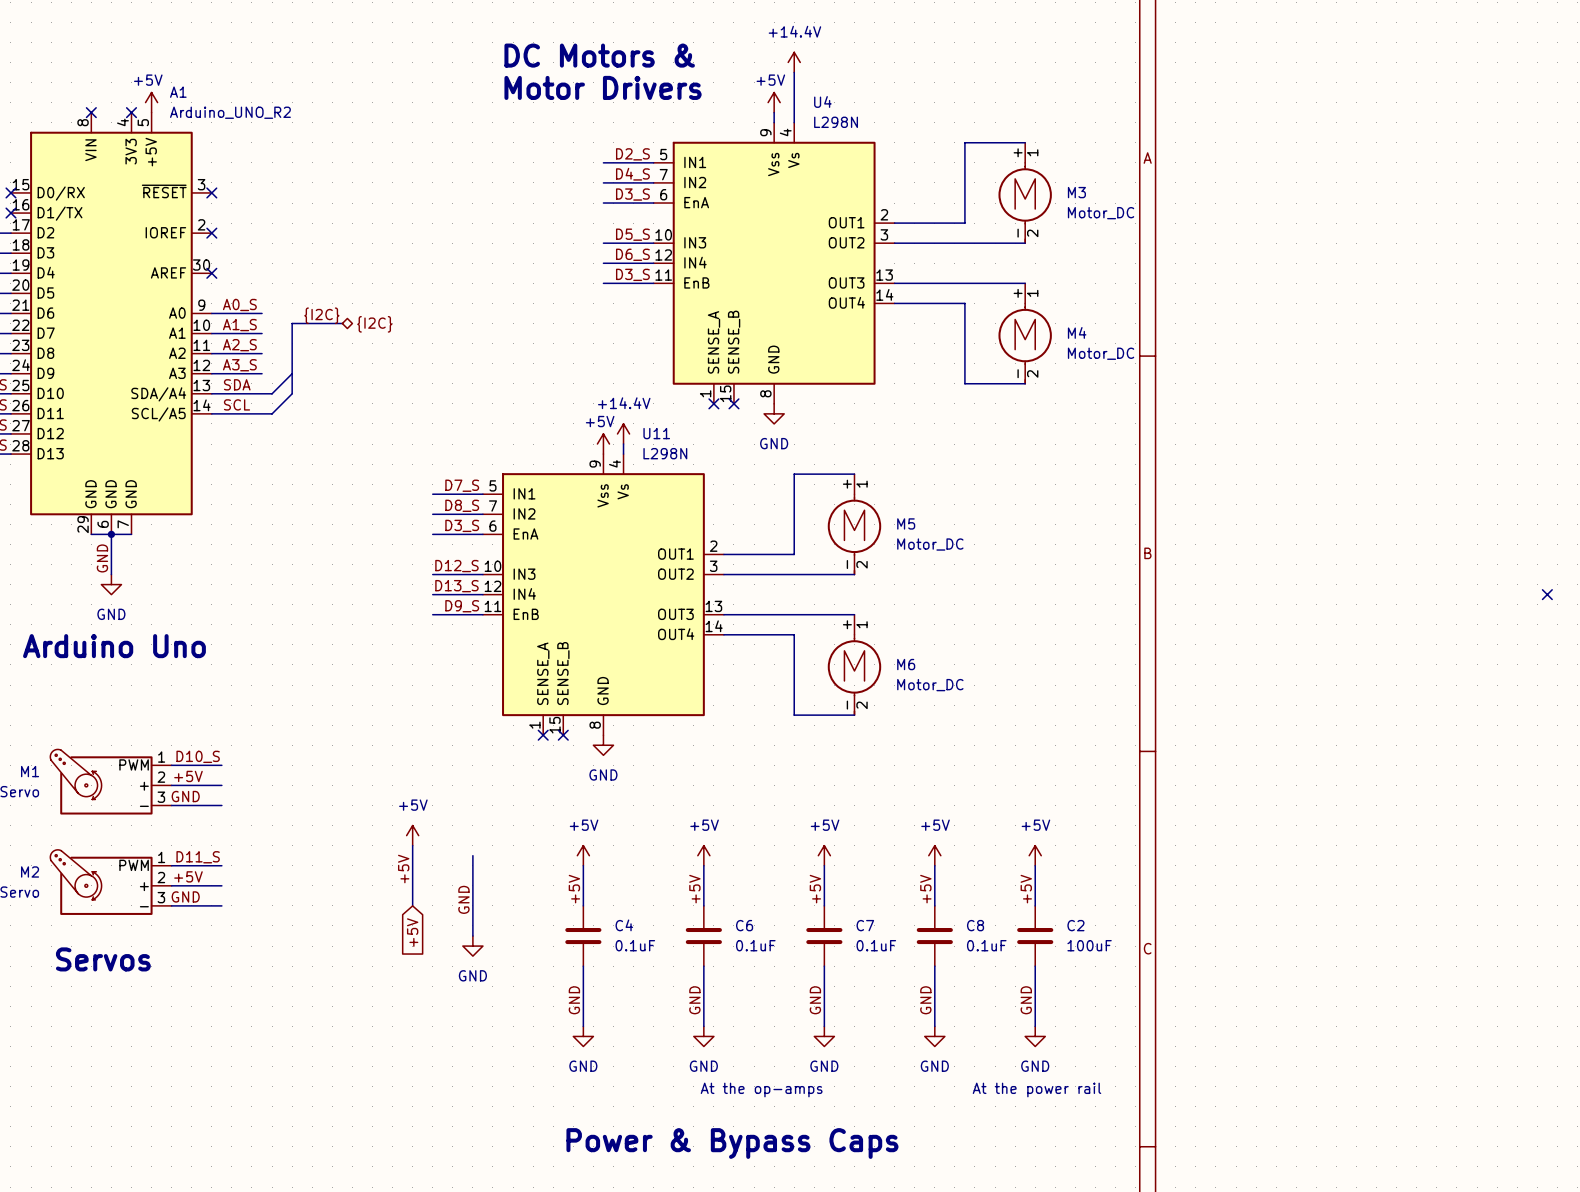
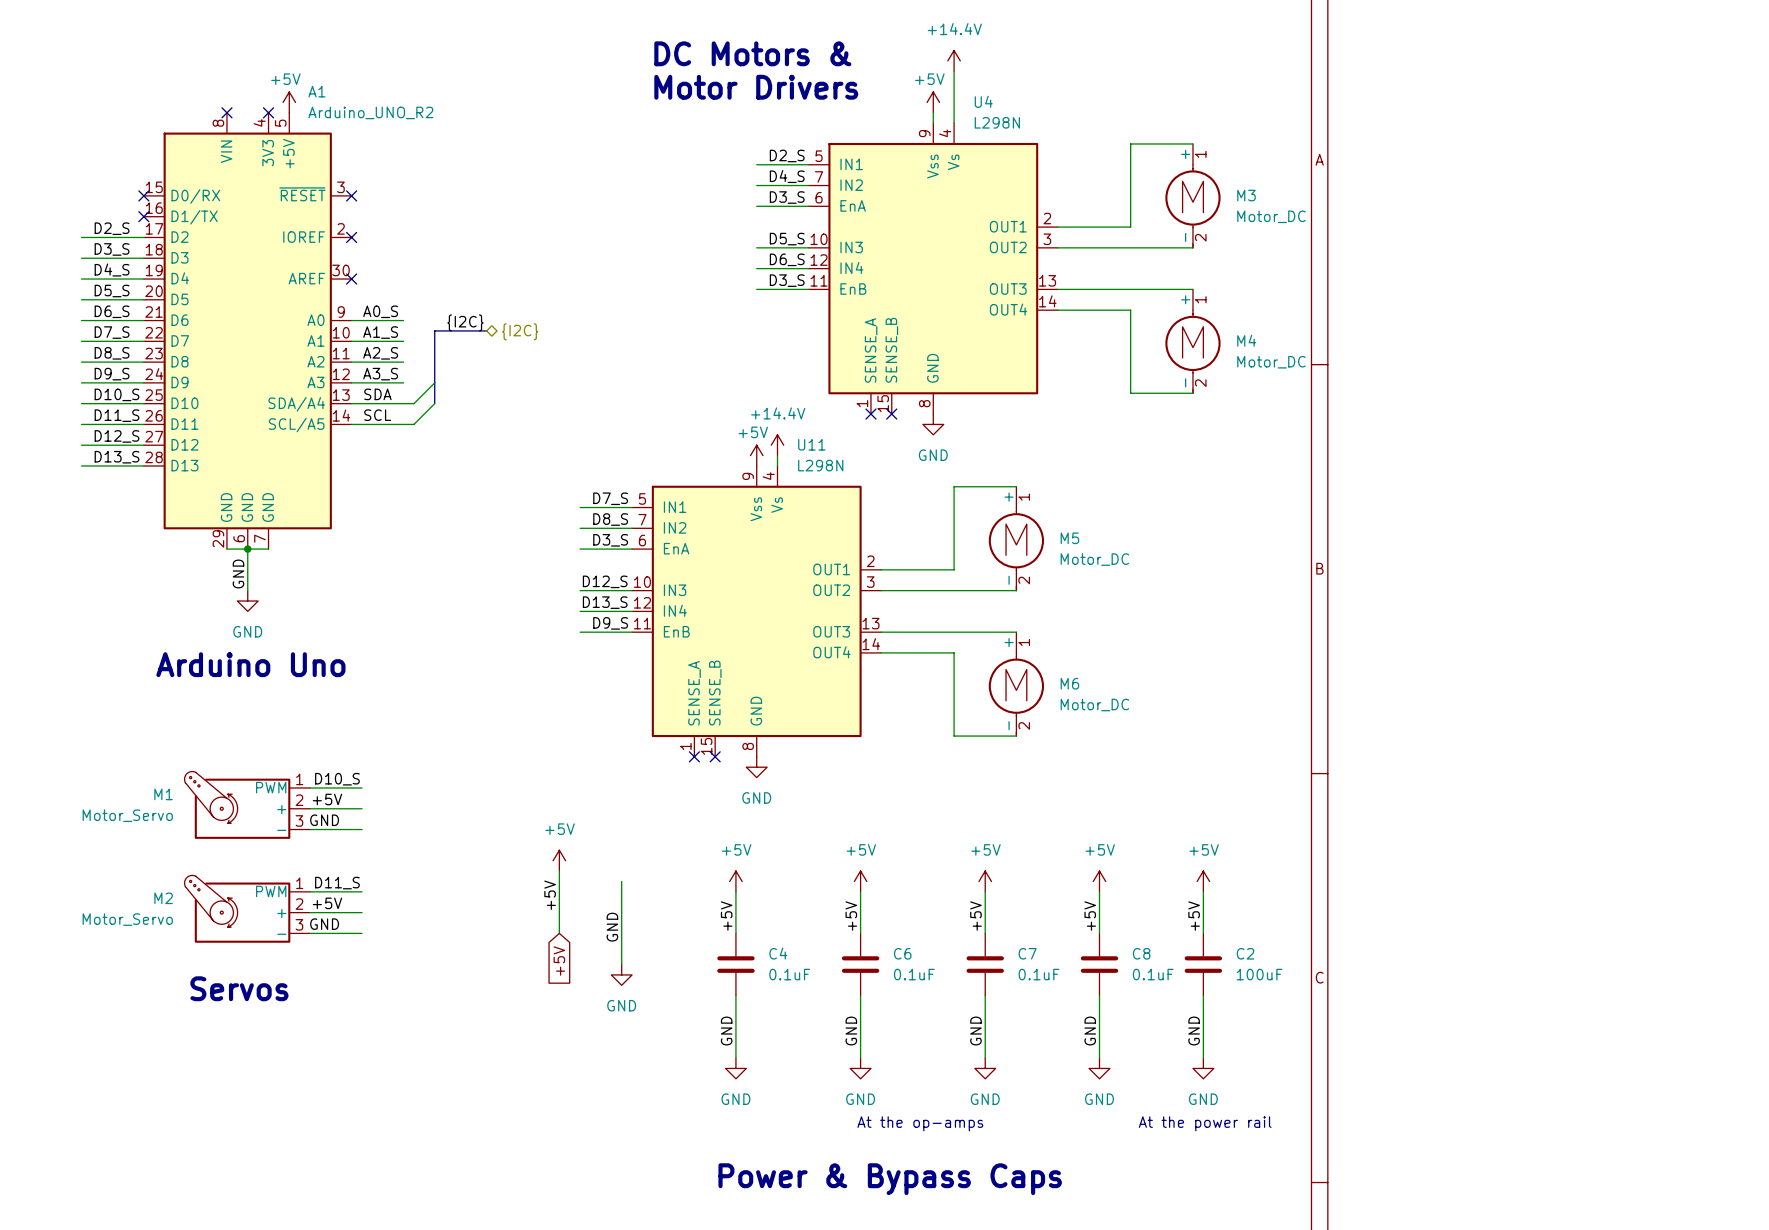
no-connect mark: (1547, 594) -> none

